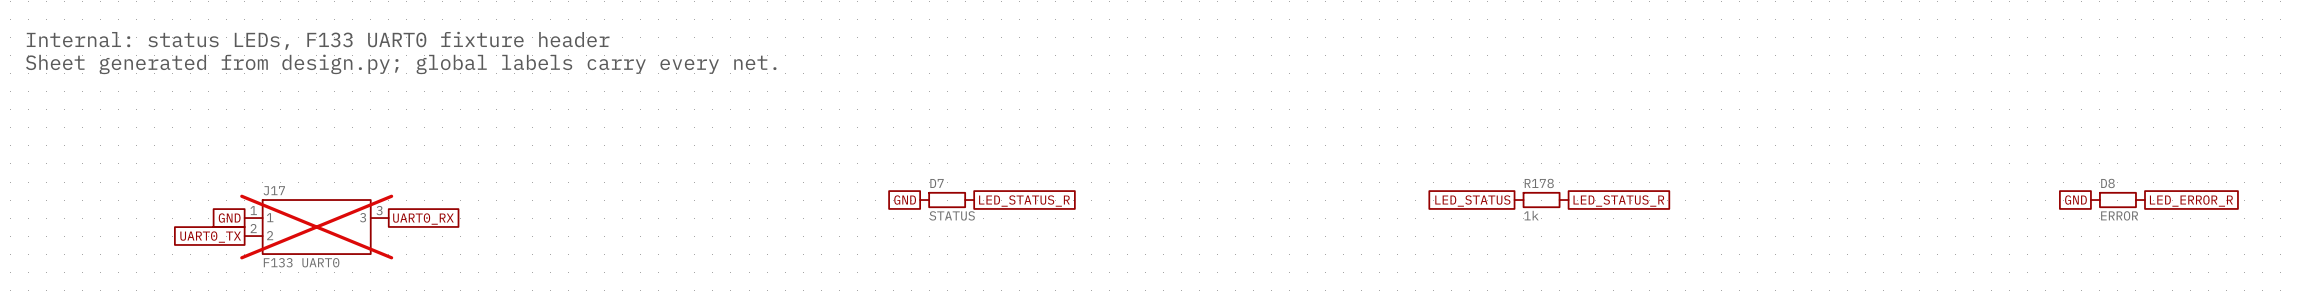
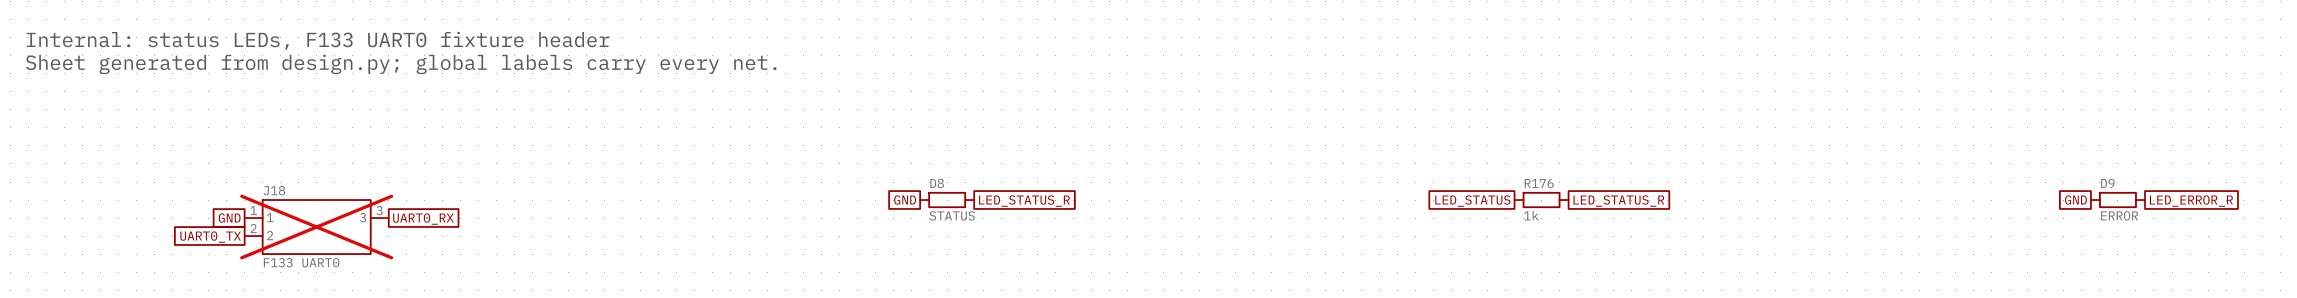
D7 name: D7 (937, 183) -> D8 (937, 183)
R178 name: R178 (1539, 183) -> R176 (1539, 183)
D8 name: D8 (2107, 183) -> D9 (2107, 183)
J17 name: J17 (274, 190) -> J18 (274, 190)

